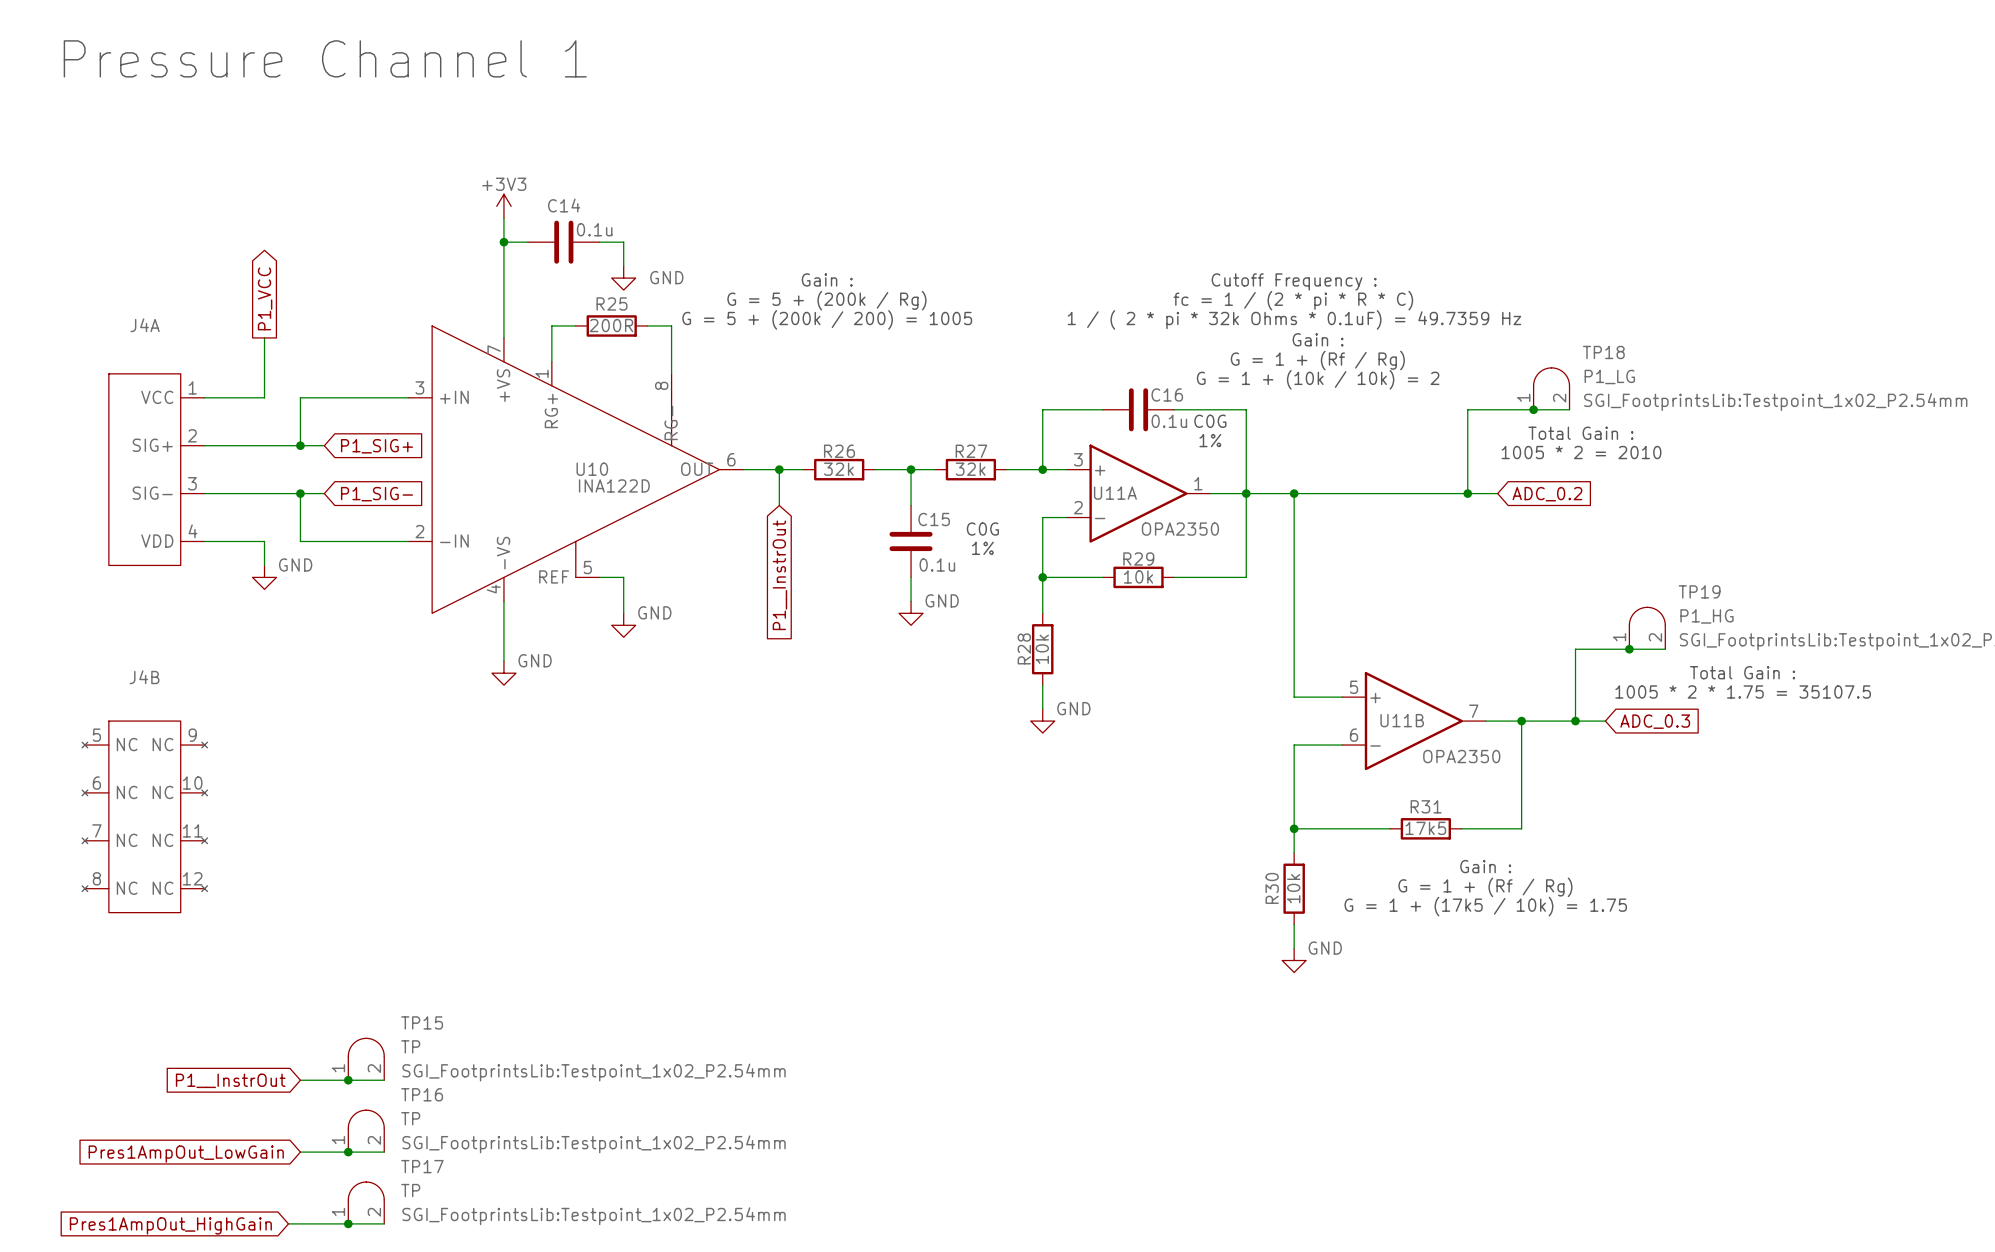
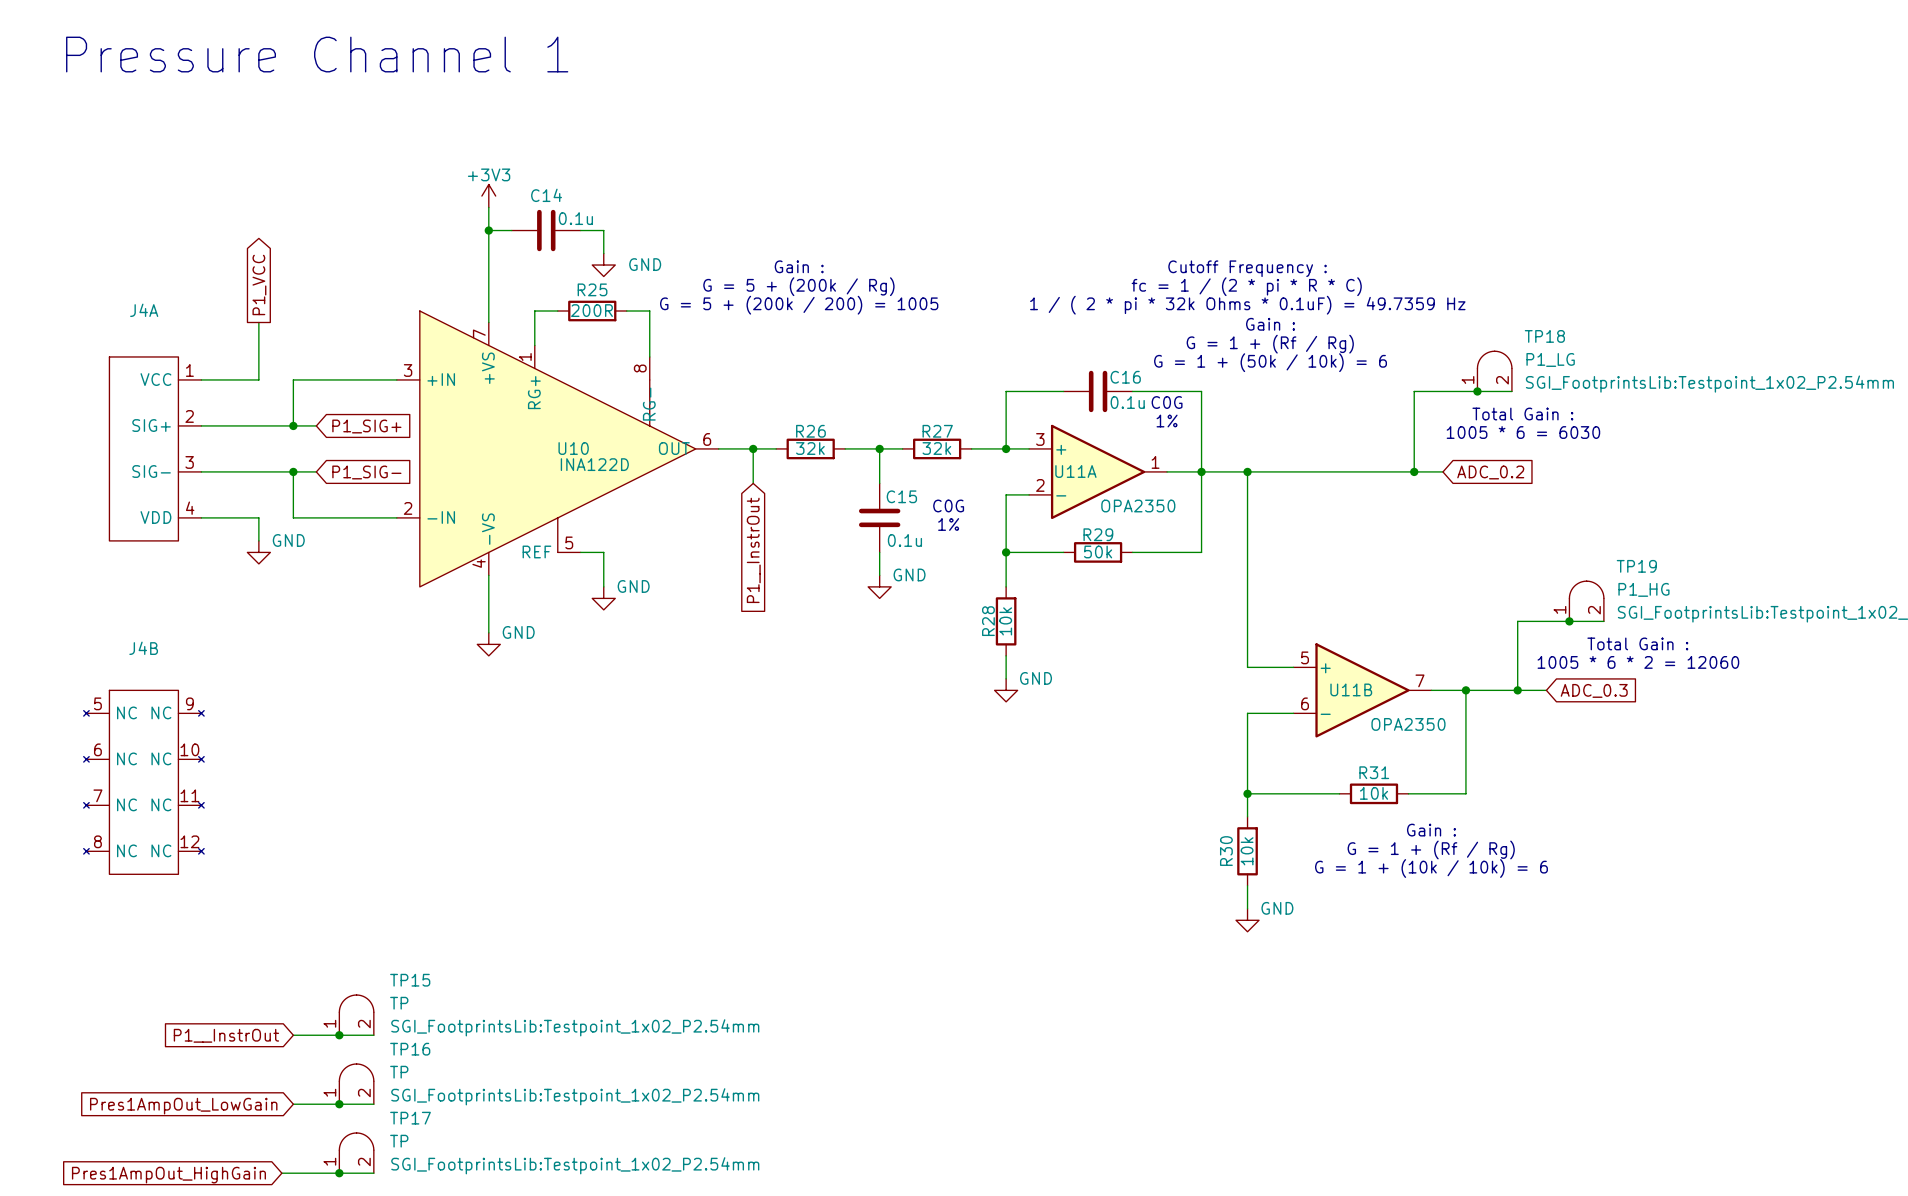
text: G = 1 + (10k / 10k) = 2 (1318, 379) -> G = 1 + (50k / 10k) = 6 (1270, 362)
text: 1005 * 2 = 2010 (1581, 452) -> 1005 * 6 = 6030 (1523, 432)
R29 value: 10k (1138, 576) -> 50k (1098, 551)
text position: Total Gain : (1742, 672) -> Total Gain : (1637, 643)
text: 1005 * 2 * 1.75 = 35107.5 (1743, 691) -> 1005 * 6 * 2 = 12060 (1638, 662)
R31 value: 17k5 (1425, 828) -> 10k (1373, 793)
text: G = 1 + (17k5 / 10k) = 1.75 (1485, 906) -> G = 1 + (10k / 10k) = 6 (1431, 868)

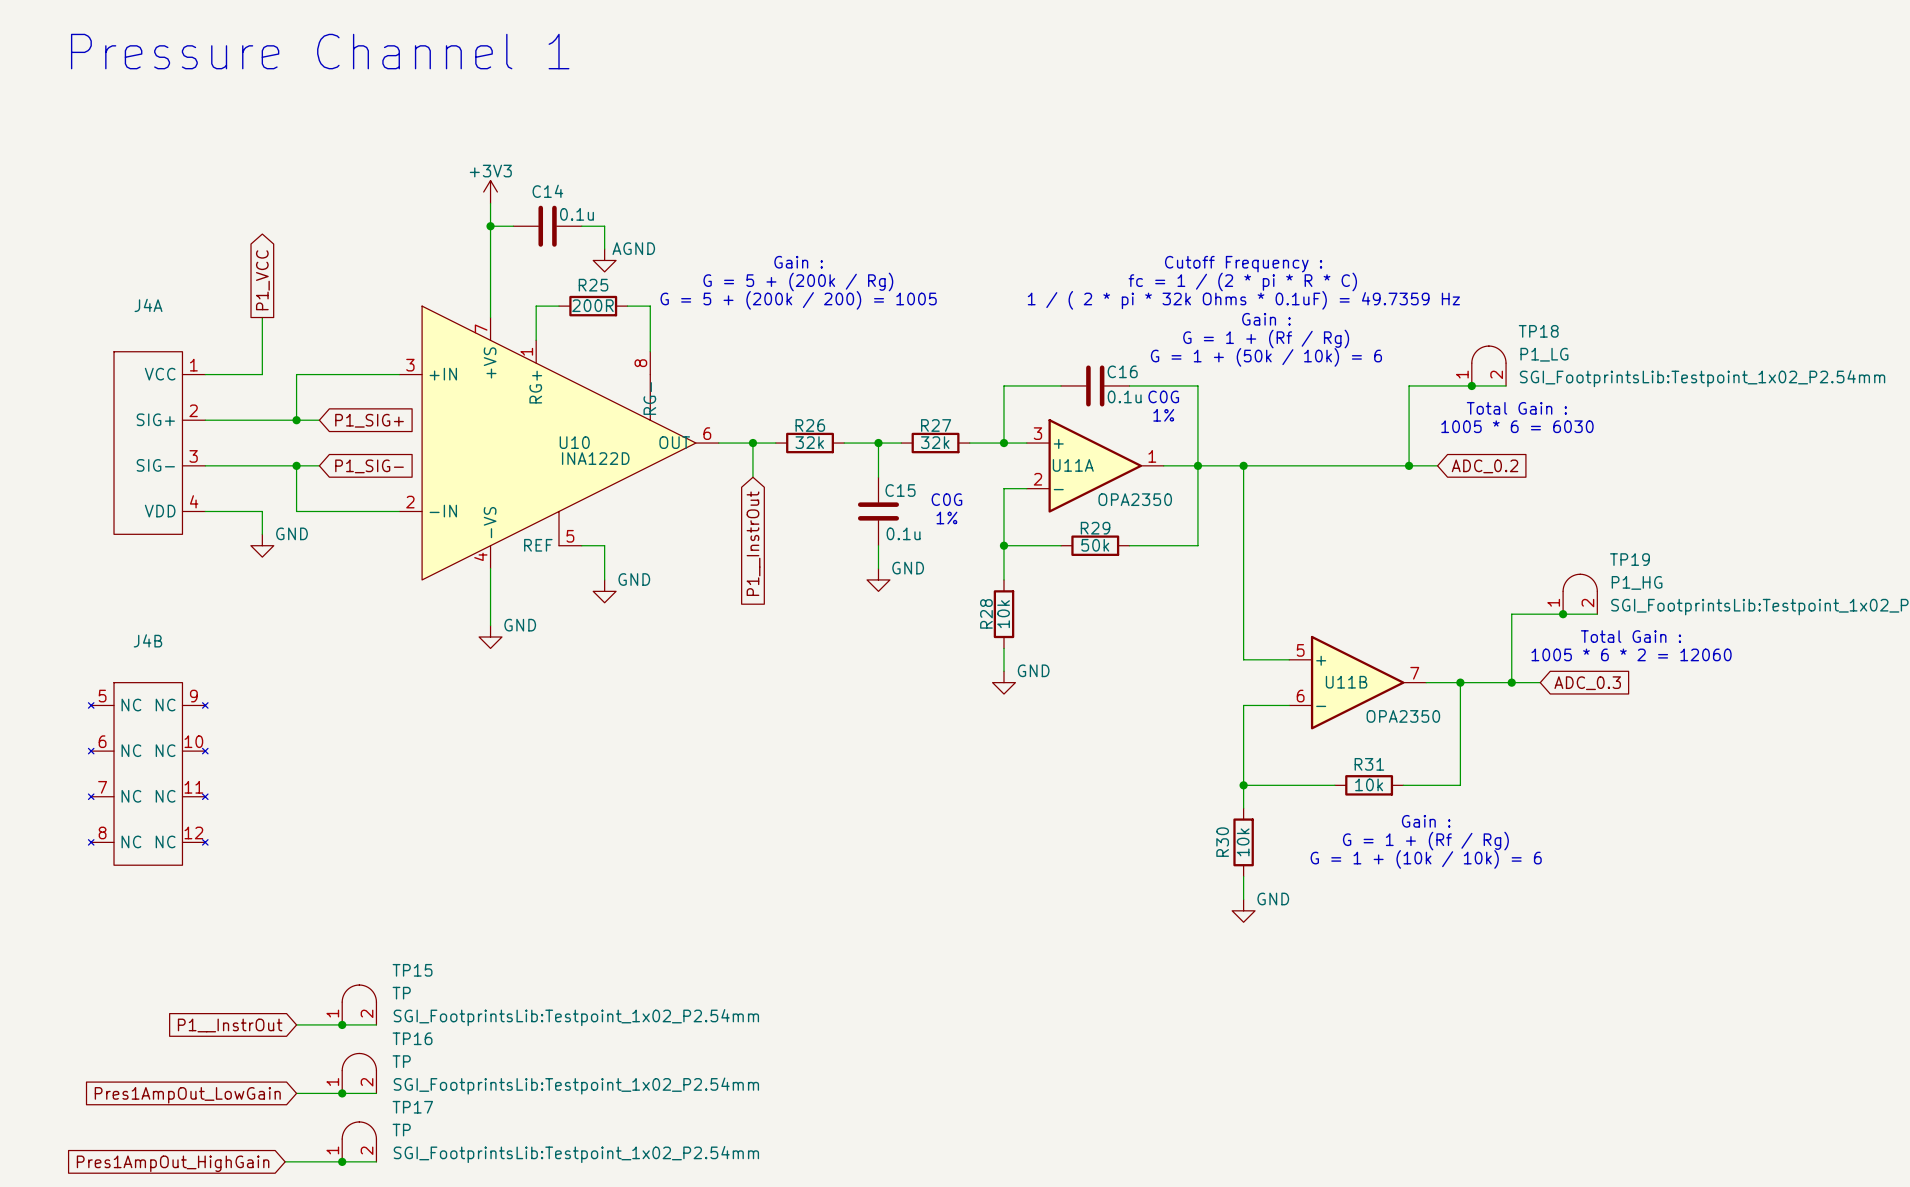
power symbol: GND (603, 265) -> AGND (604, 260)

